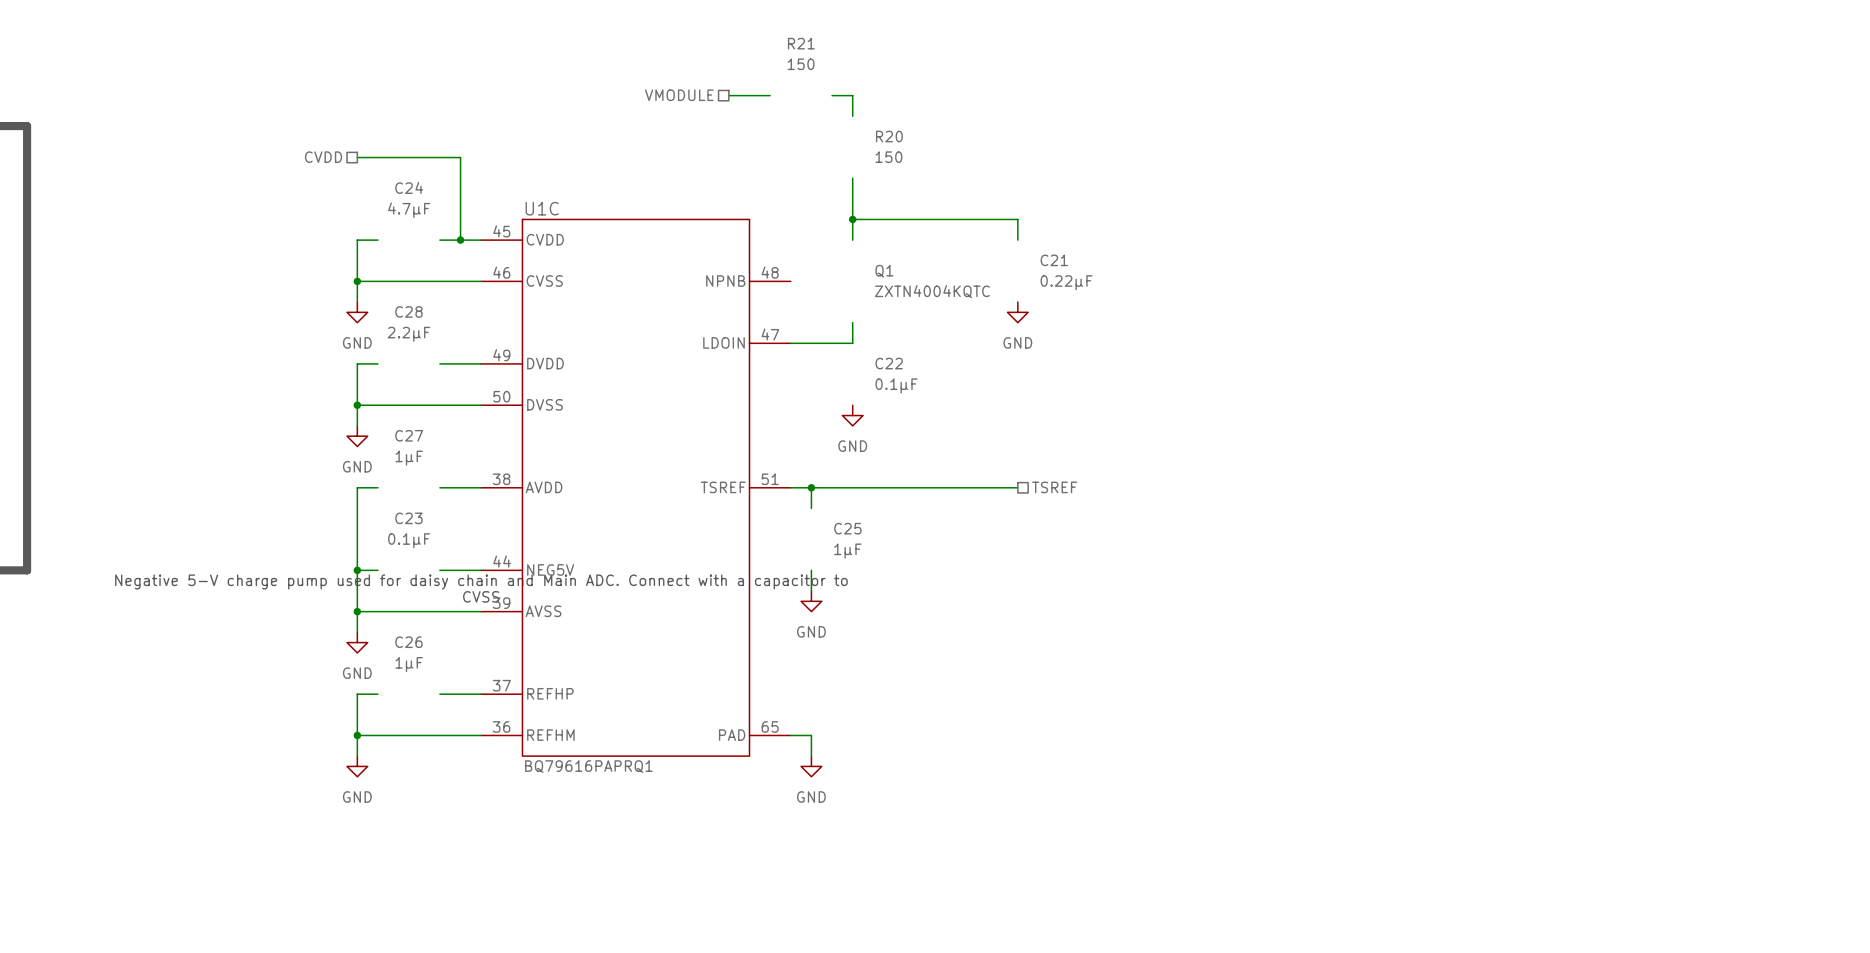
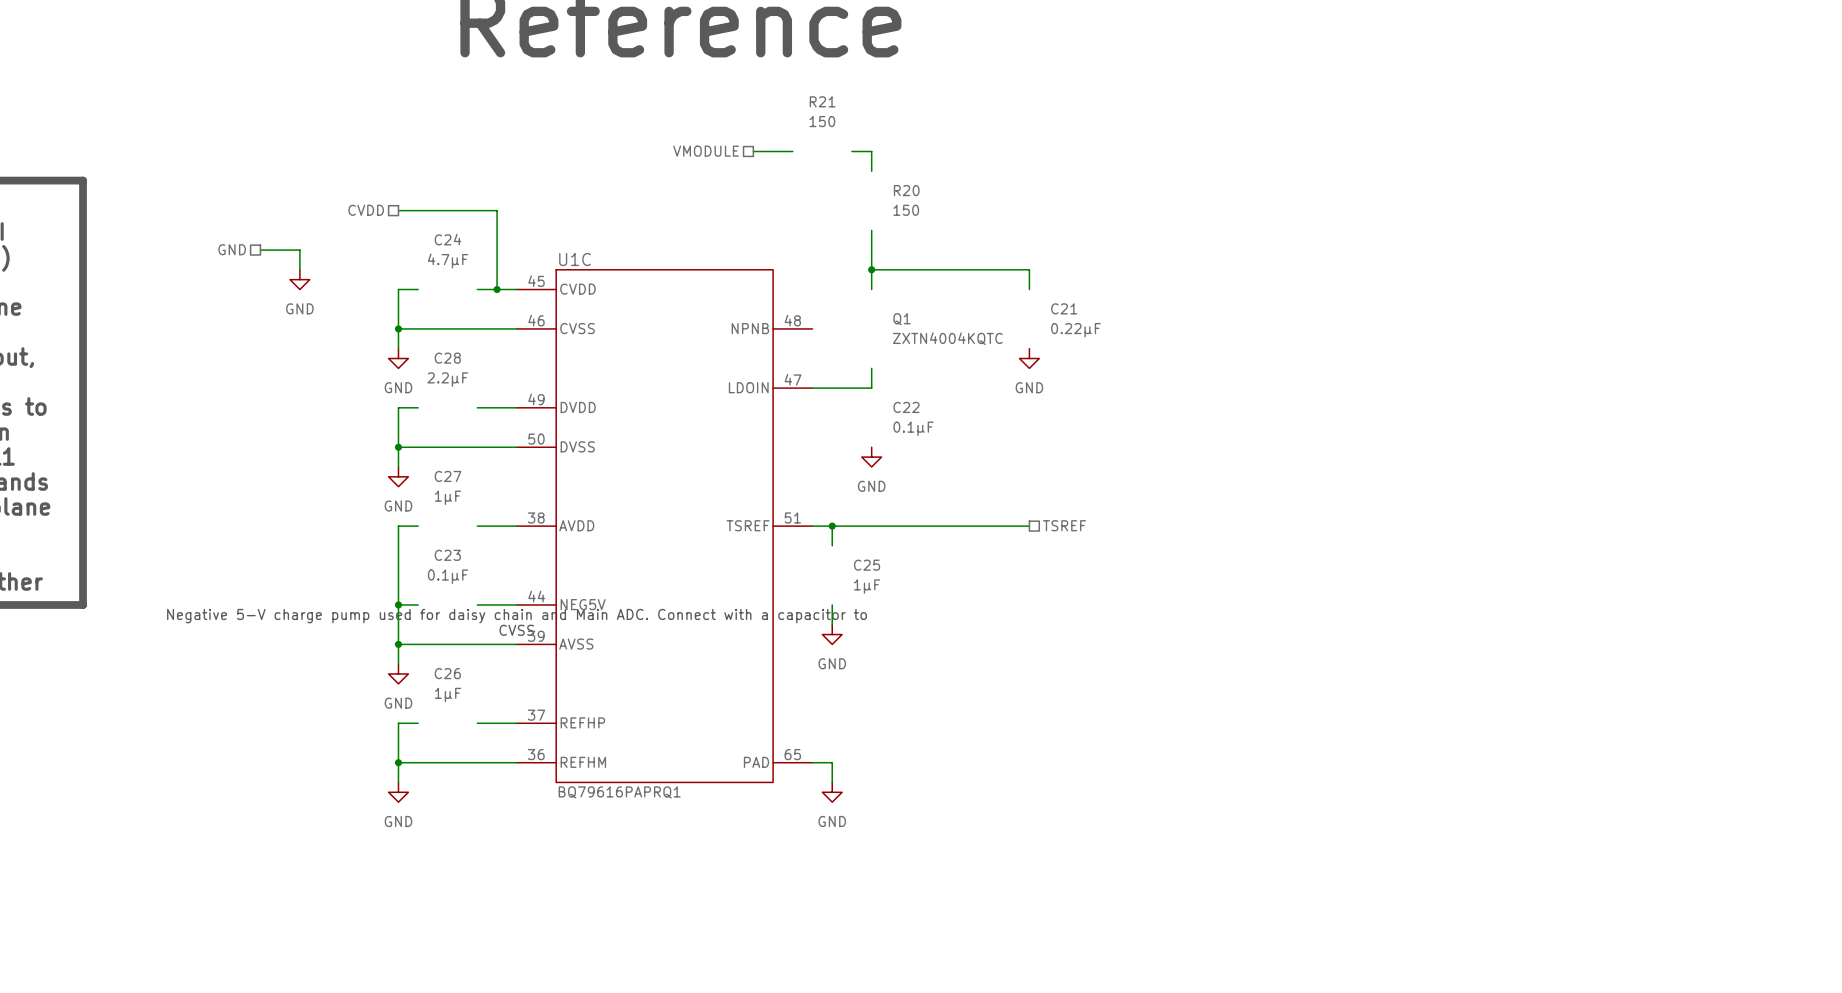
hierarchical label: none -> GND (232, 249)
wire: none -> (260, 250) (299, 250) (299, 269)
power symbol: none -> GND (299, 279)

